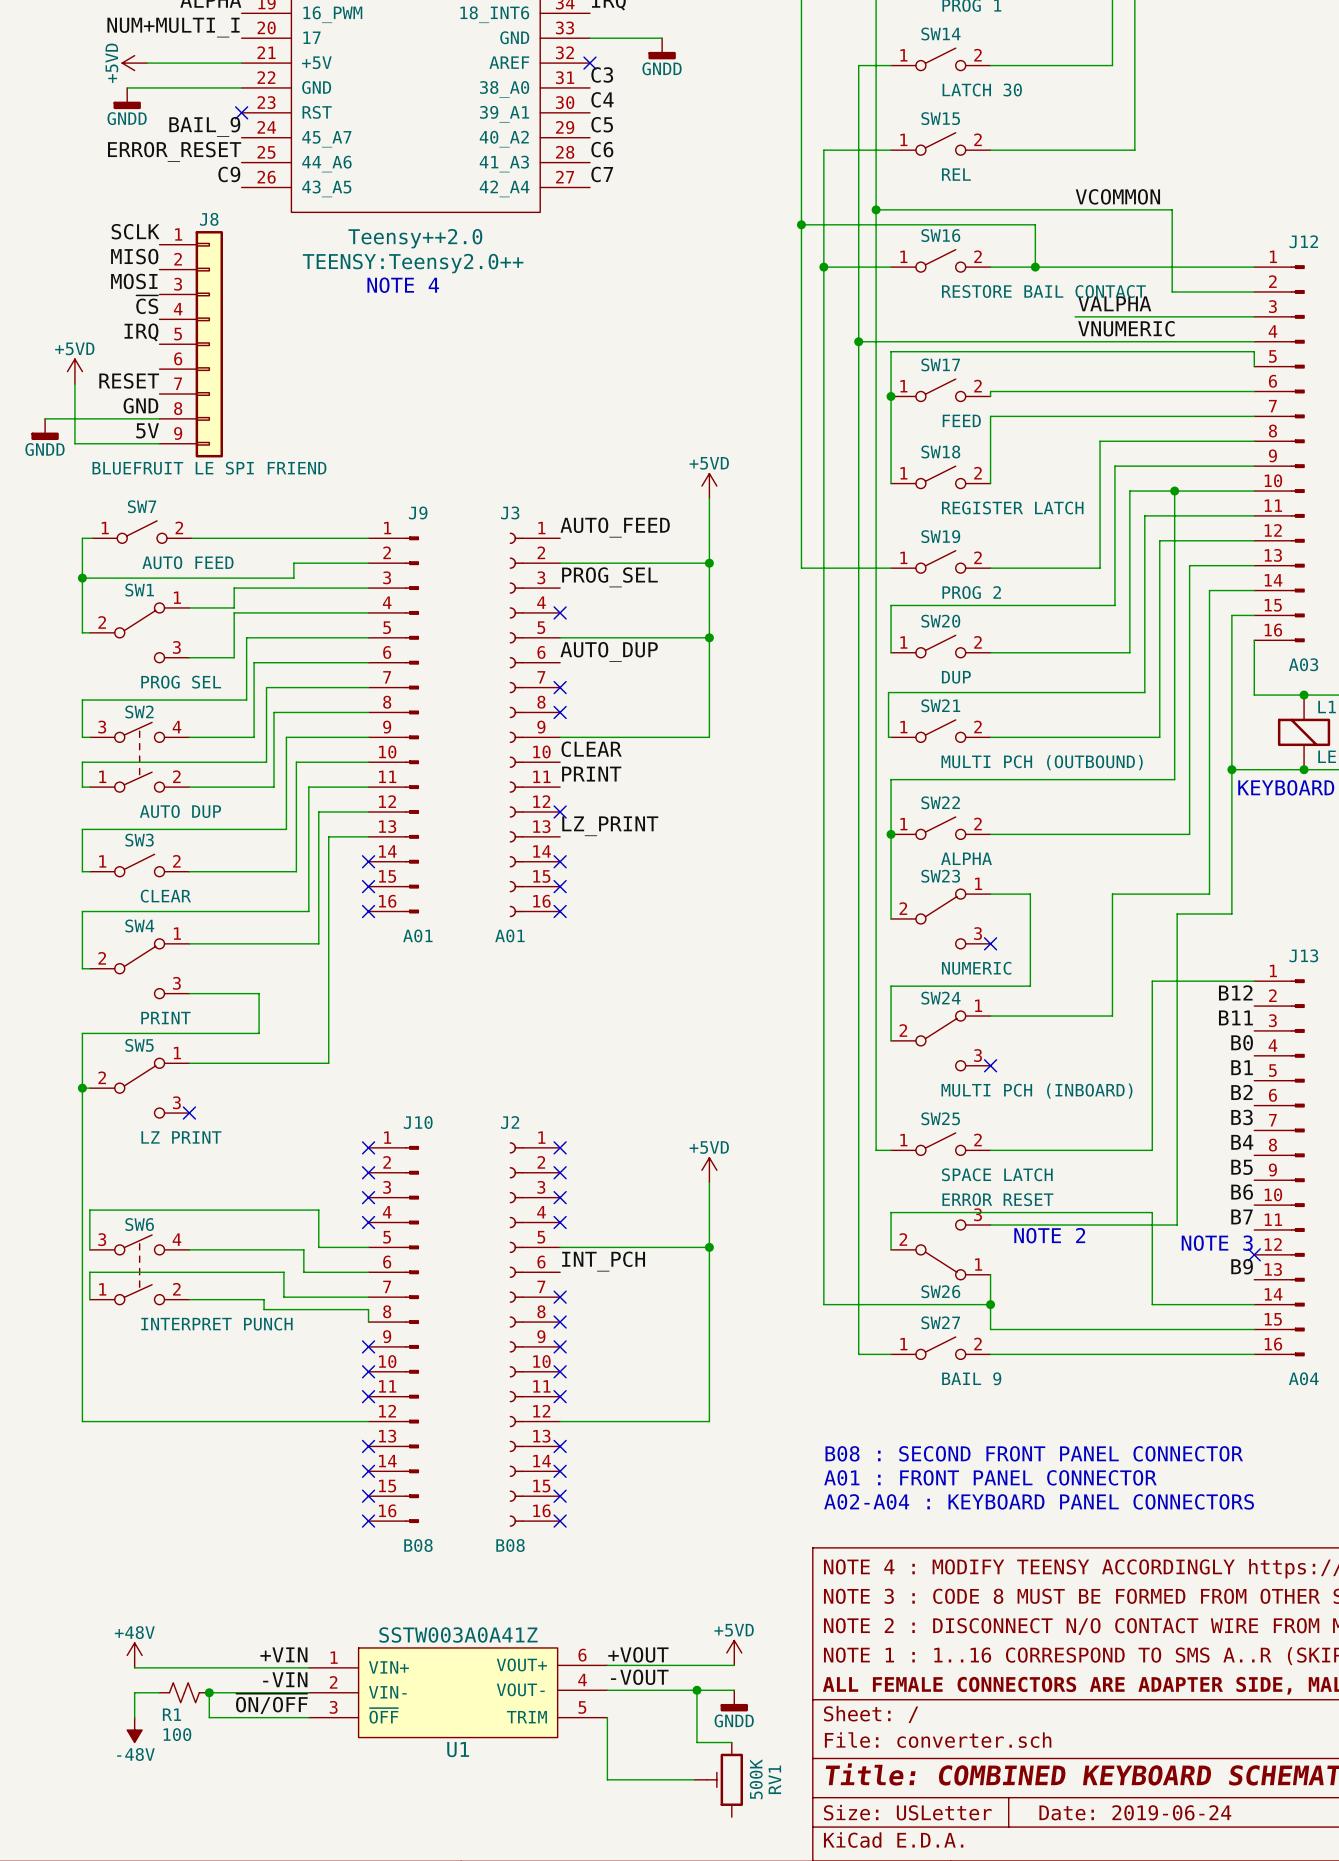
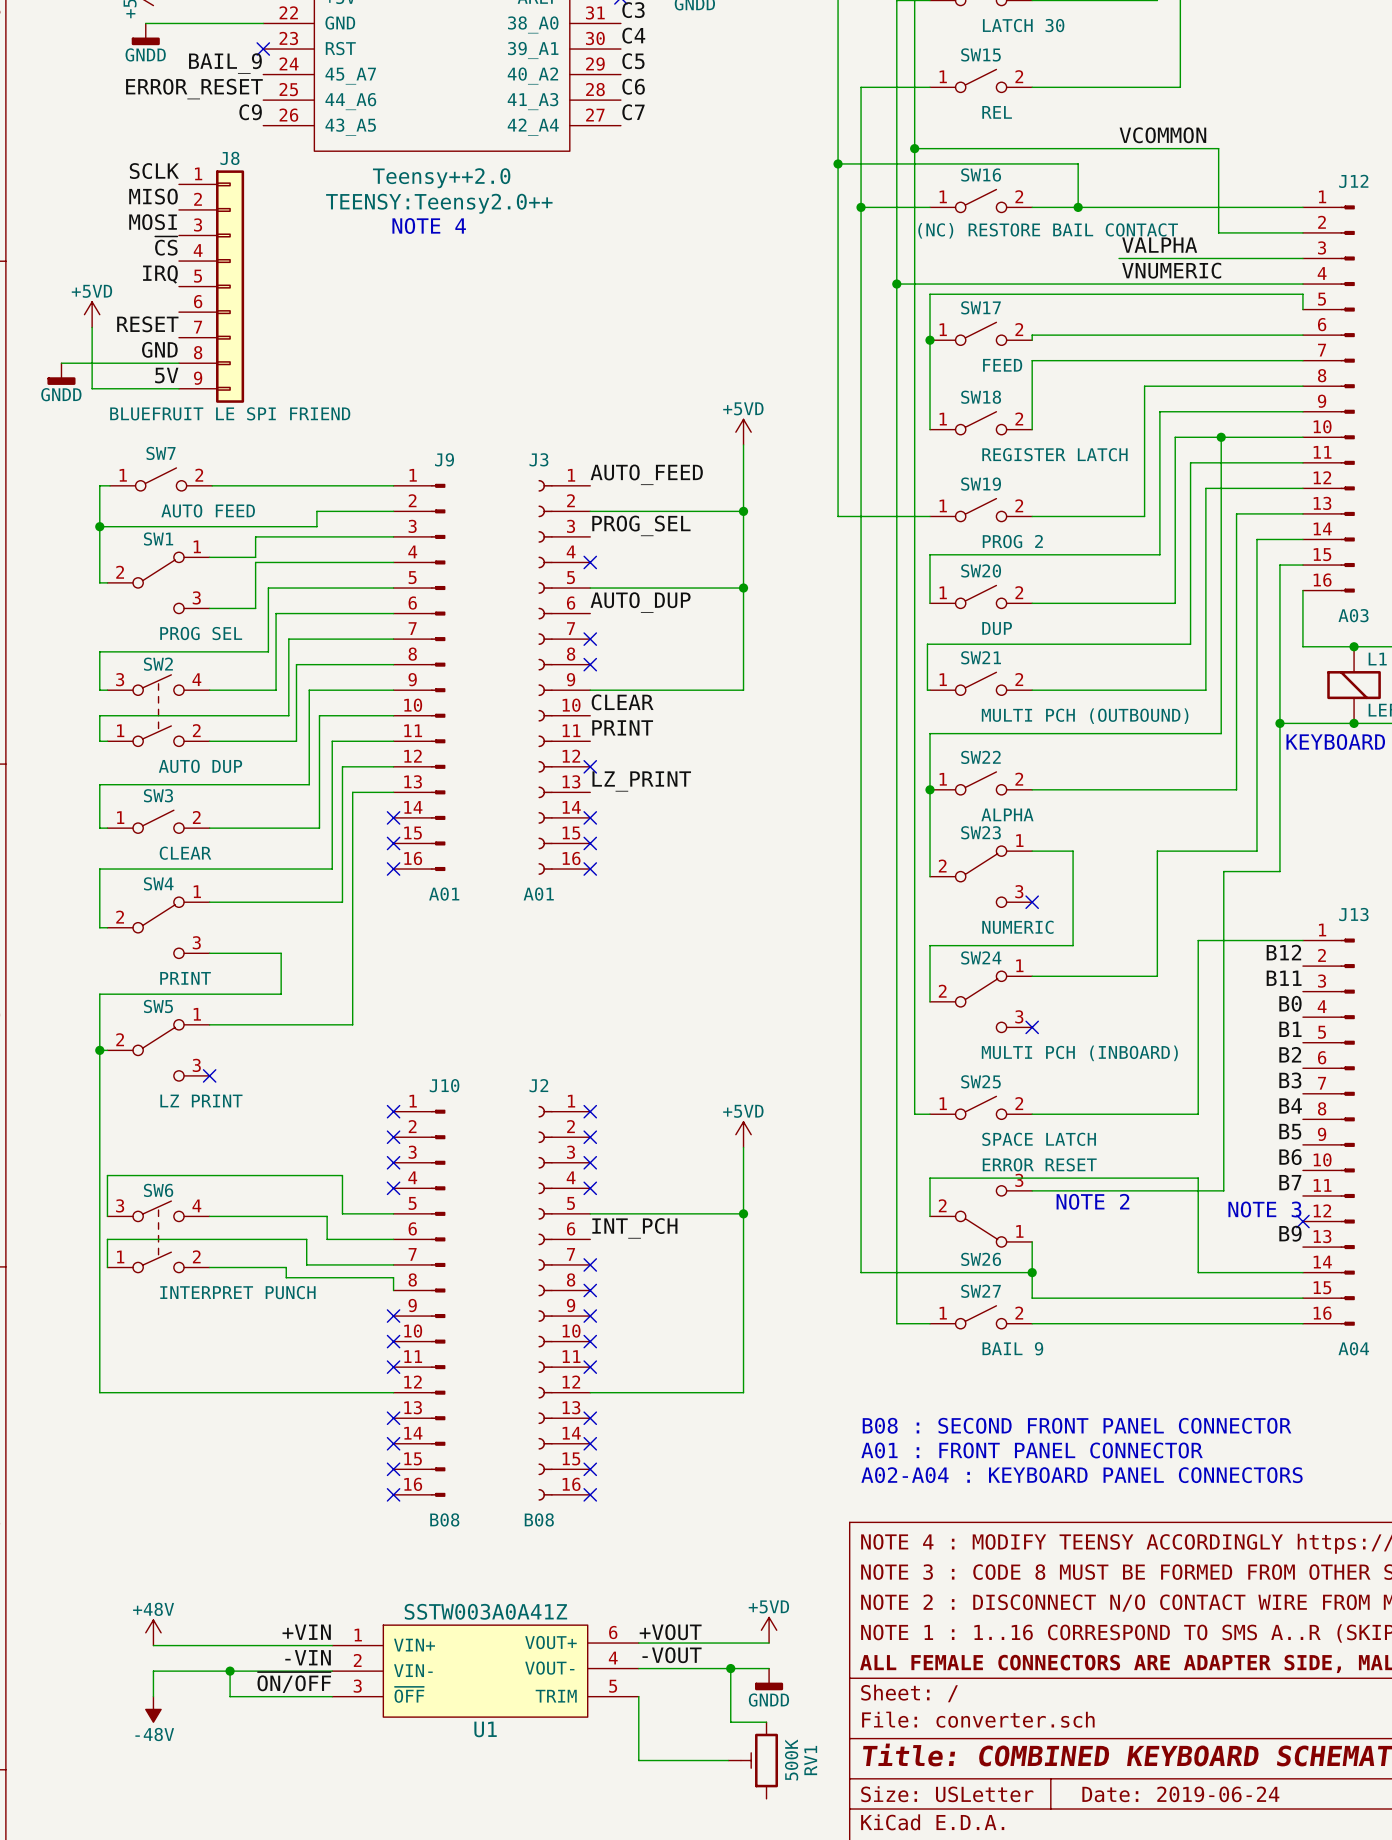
SW16 value: RESTORE BAIL CONTACT (1043, 291) -> (NC) RESTORE BAIL CONTACT (1048, 230)
R1: 100 (184, 1692) -> none

